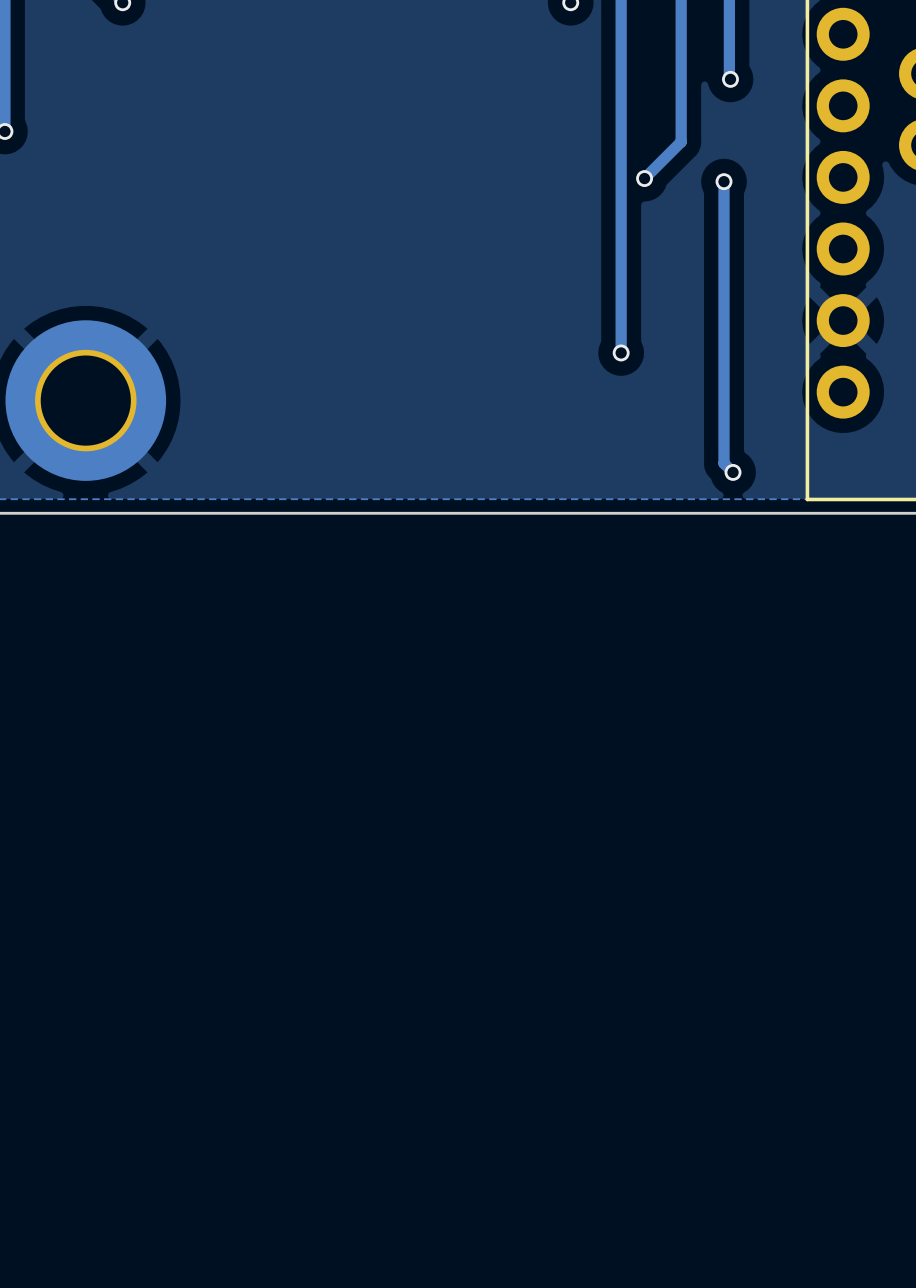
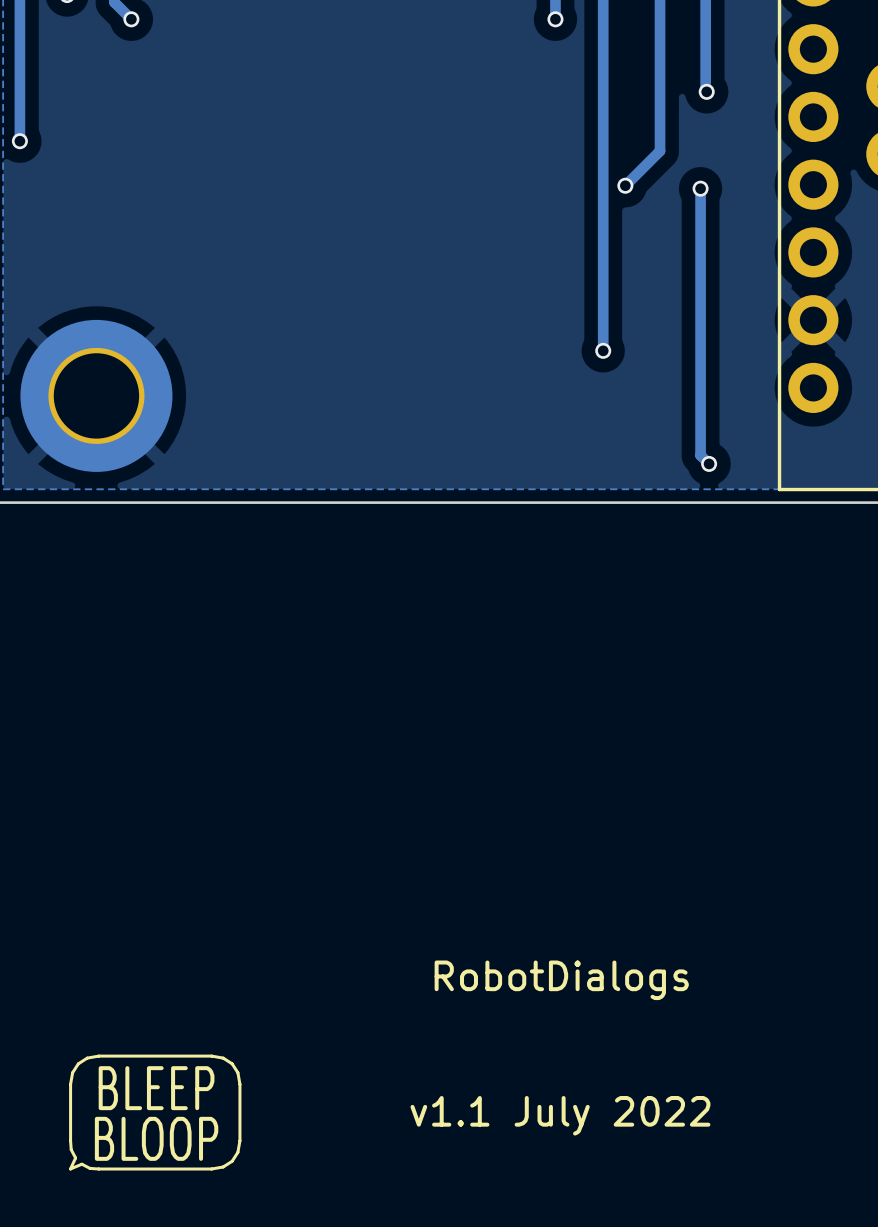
text: none -> RobotDialogs (561, 980)
drawing: none -> [69, 1054, 242, 1171]
text: none -> v1.1 July 2022 (560, 1115)

